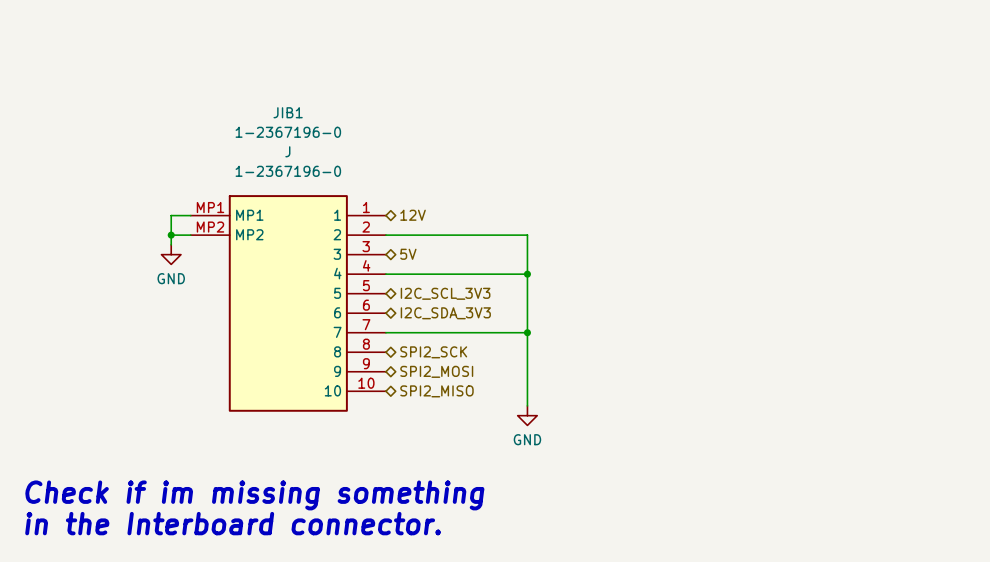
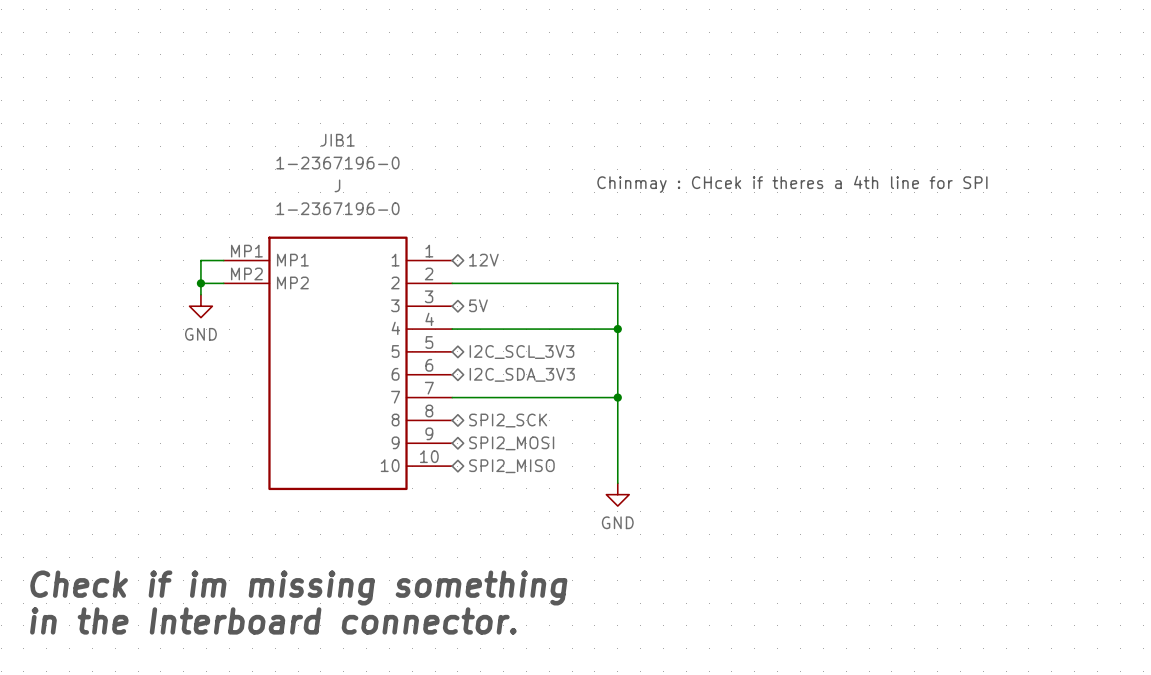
text: none -> Chinmay : CHcek if theres a 4th line for SPI (792, 184)

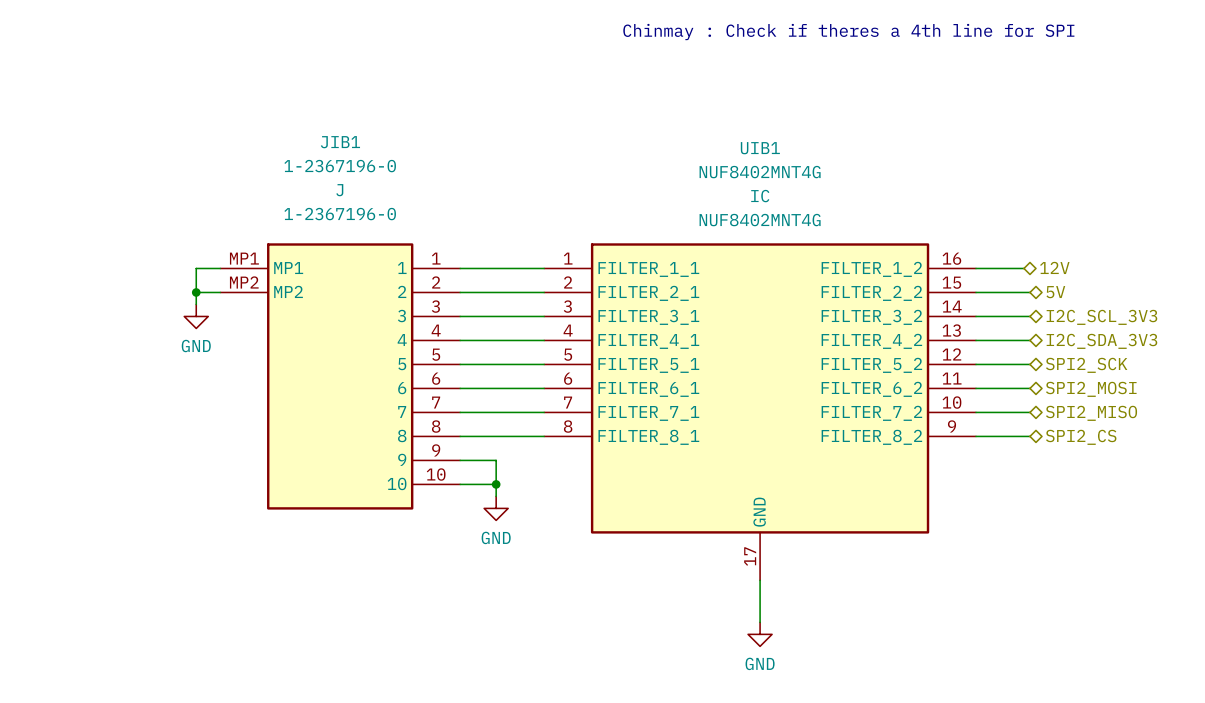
text: none -> Chinmay : Check if theres a 4th line for SPI (848, 32)
text: Chinmay : CHcek if theres a 4th line for SPI (792, 184) -> none
wire: none -> (460, 268) (544, 268)
hierarchical label: 12V (483, 260) -> none
wire: none -> (975, 268) (1023, 268)
hierarchical label: none -> 12V (1054, 267)
hierarchical label: none -> 5V (1055, 292)
wire: none -> (975, 292) (1029, 292)
hierarchical label: 5V (478, 305) -> none
wire: none -> (460, 316) (544, 316)
wire: none -> (975, 316) (1029, 316)
hierarchical label: none -> I2C_SCL_3V3 (1101, 317)
junction: (617, 329) -> none
wire: none -> (975, 340) (1029, 340)
hierarchical label: none -> I2C_SDA_3V3 (1101, 341)
wire: none -> (460, 364) (544, 364)
wire: none -> (975, 364) (1029, 364)
hierarchical label: I2C_SCL_3V3 (521, 352) -> none
hierarchical label: none -> SPI2_SCK (1086, 365)
wire: none -> (460, 388) (544, 388)
hierarchical label: I2C_SDA_3V3 (522, 374) -> none
wire: none -> (975, 388) (1029, 388)
hierarchical label: none -> SPI2_MOSI (1091, 389)
junction: (617, 397) -> none
UIB1: none -> NUF8402MNT4G (760, 411)
wire: none -> (975, 412) (1029, 412)
hierarchical label: none -> SPI2_MISO (1091, 413)
wire: none -> (460, 436) (544, 436)
hierarchical label: SPI2_SCK (508, 420) -> none
wire: none -> (975, 436) (1029, 436)
hierarchical label: none -> SPI2_CS (1081, 437)
wire: none -> (460, 460) (496, 460) (496, 496)
hierarchical label: SPI2_MOSI (511, 443) -> none
wire: none -> (460, 484) (496, 484)
junction: none -> (496, 484)
hierarchical label: SPI2_MISO (511, 466) -> none
power symbol: none -> GND (496, 508)
power symbol: GND (617, 494) -> none
wire: none -> (760, 580) (760, 622)
text: Check if im missing something (298, 587) -> none
power symbol: none -> GND (760, 634)
text: in the Interboard connector. (273, 620) -> none

